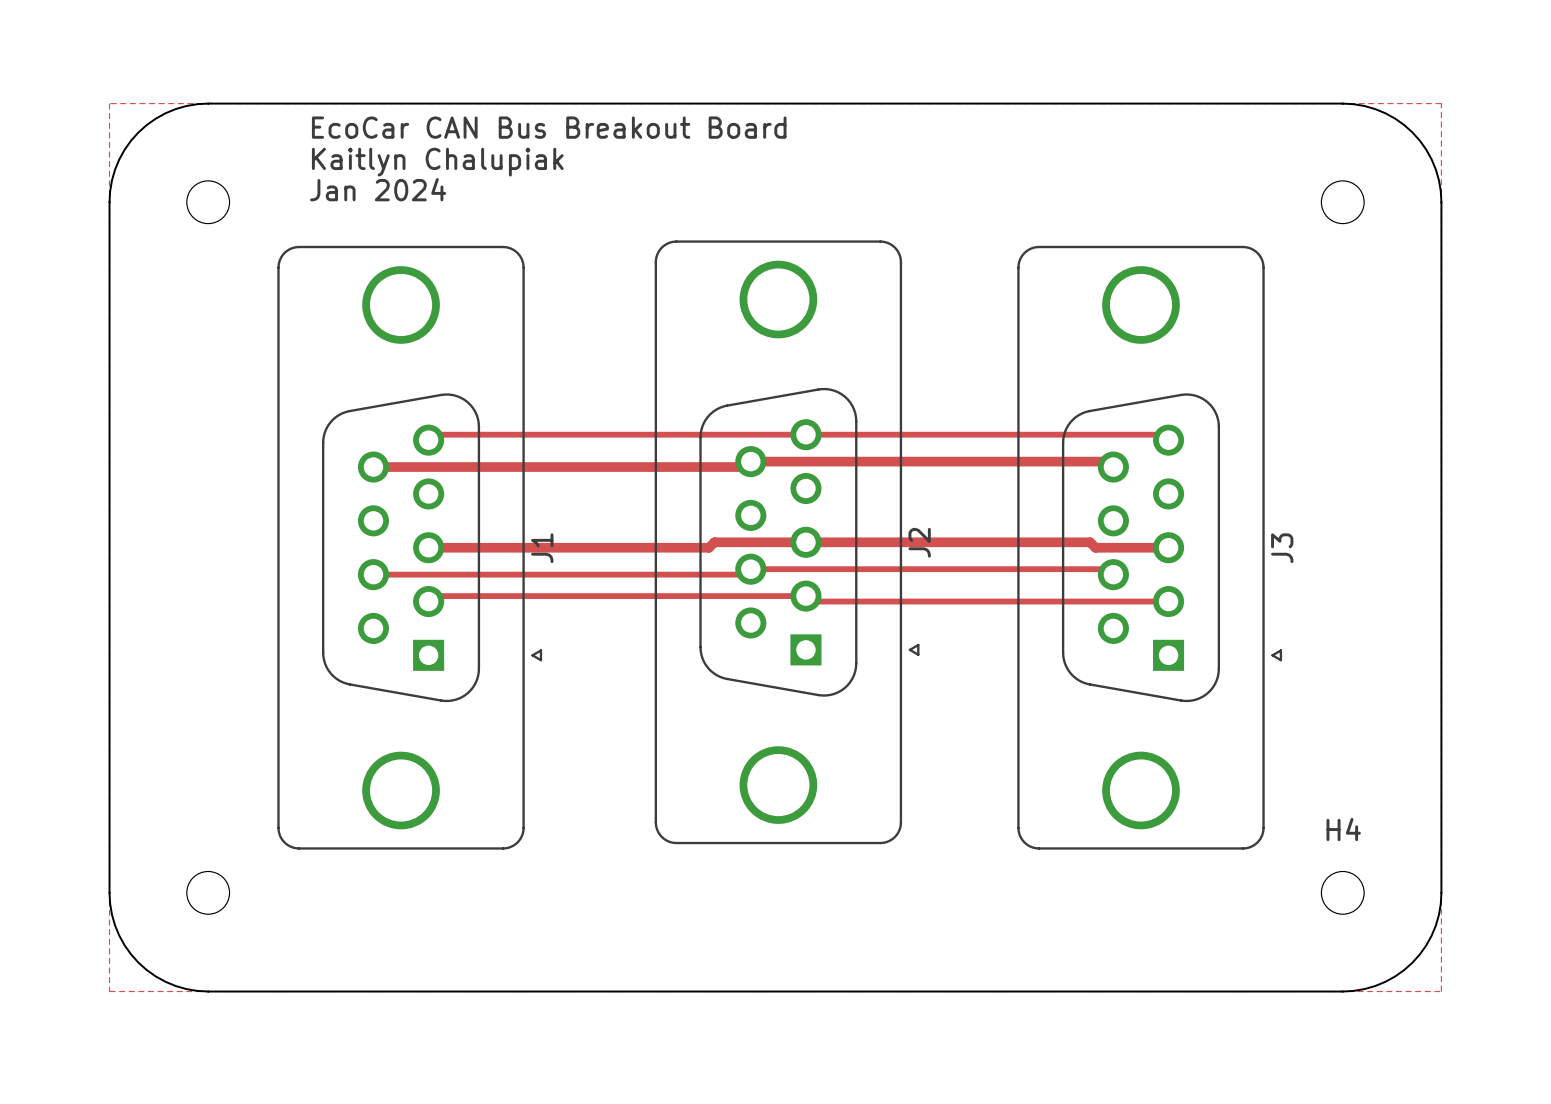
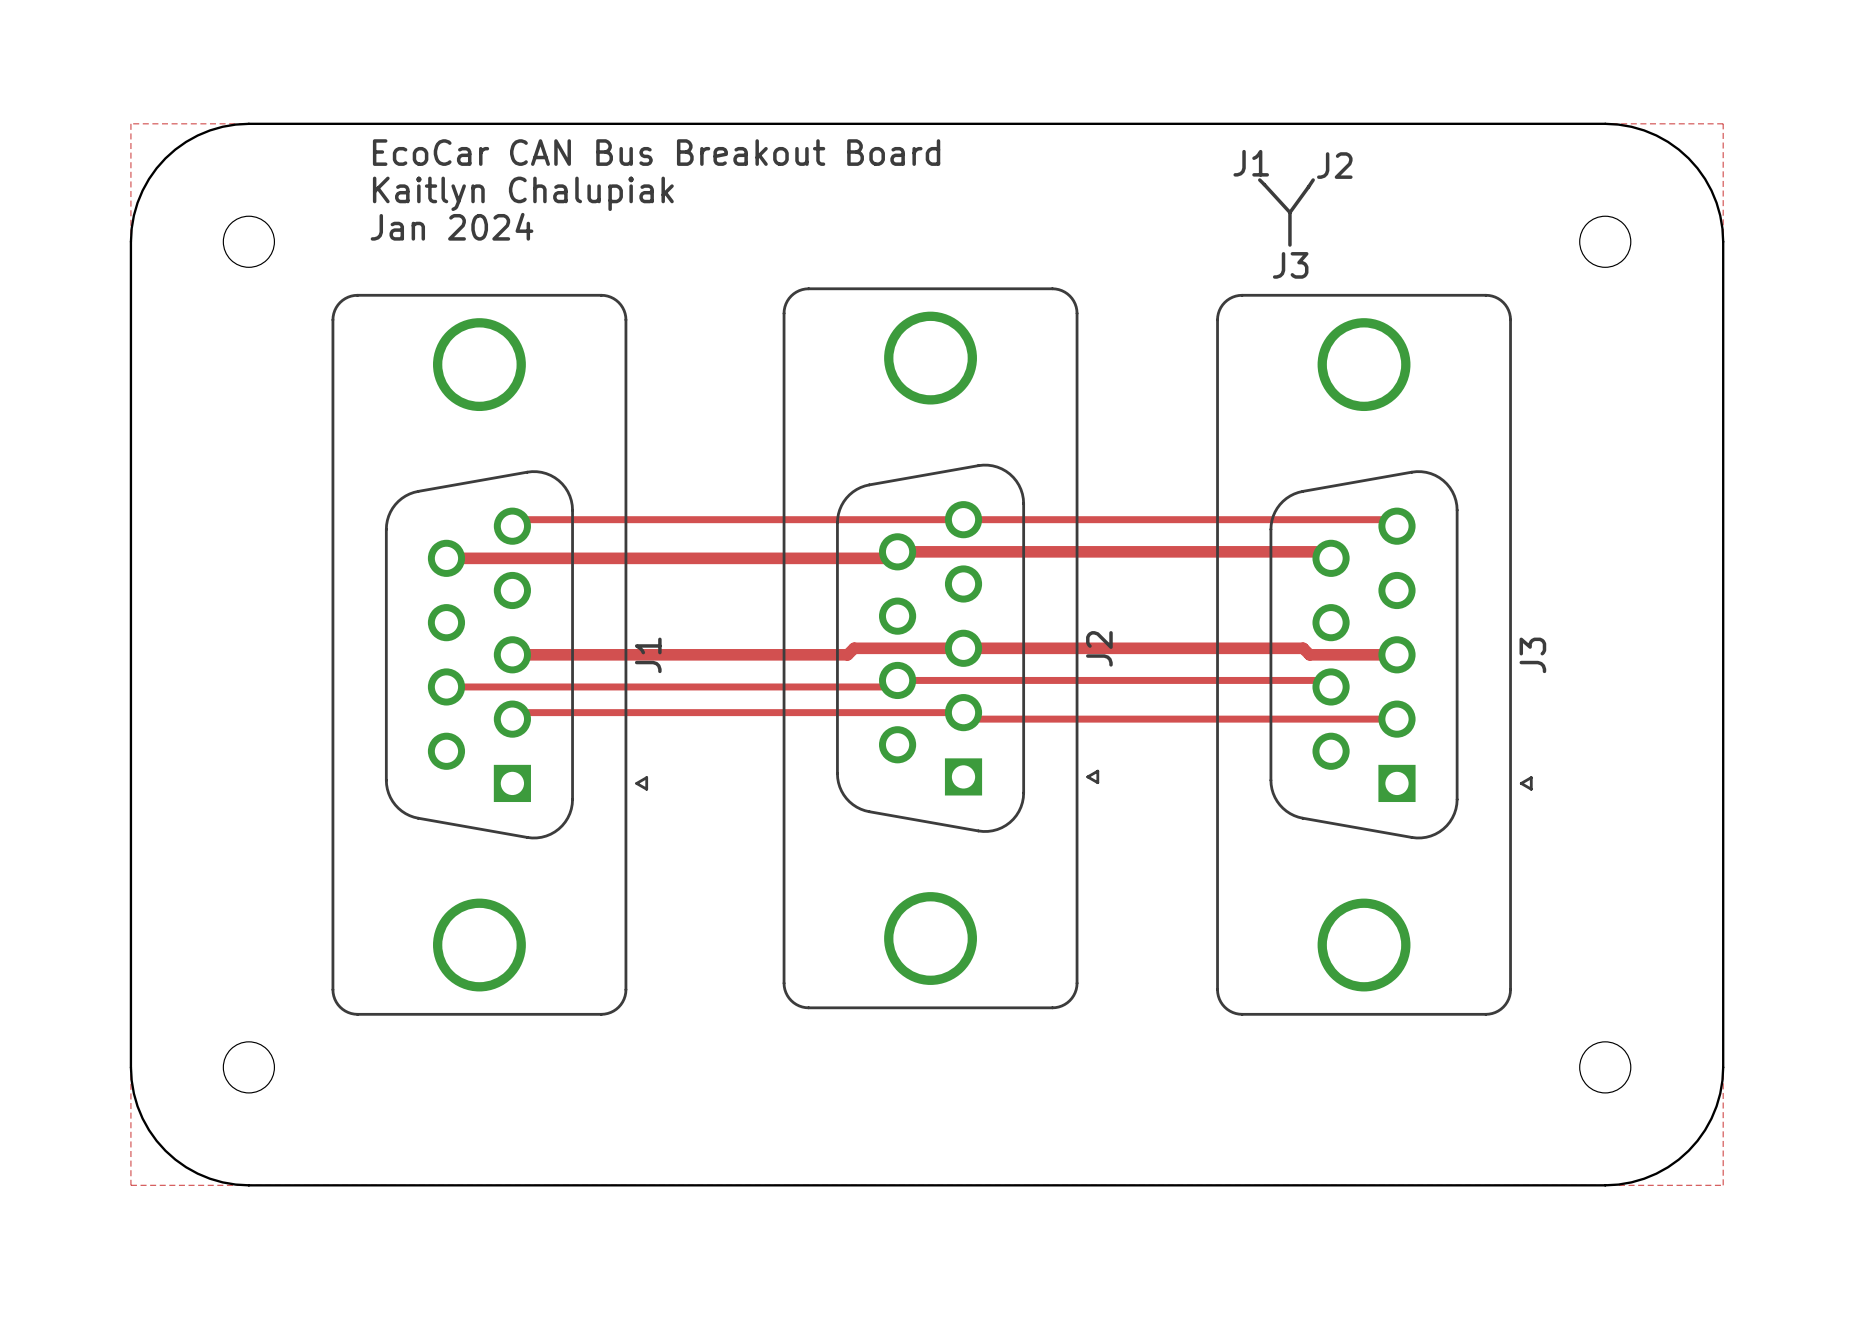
text: none -> J1 (1251, 163)
text: none -> J2 (1334, 165)
line: none -> (1259, 180) (1289, 212)
line: none -> (1313, 180) (1289, 212)
line: none -> (1289, 212) (1289, 245)
text: none -> J3 (1290, 265)
H4 name: H4 (1343, 829) -> none

